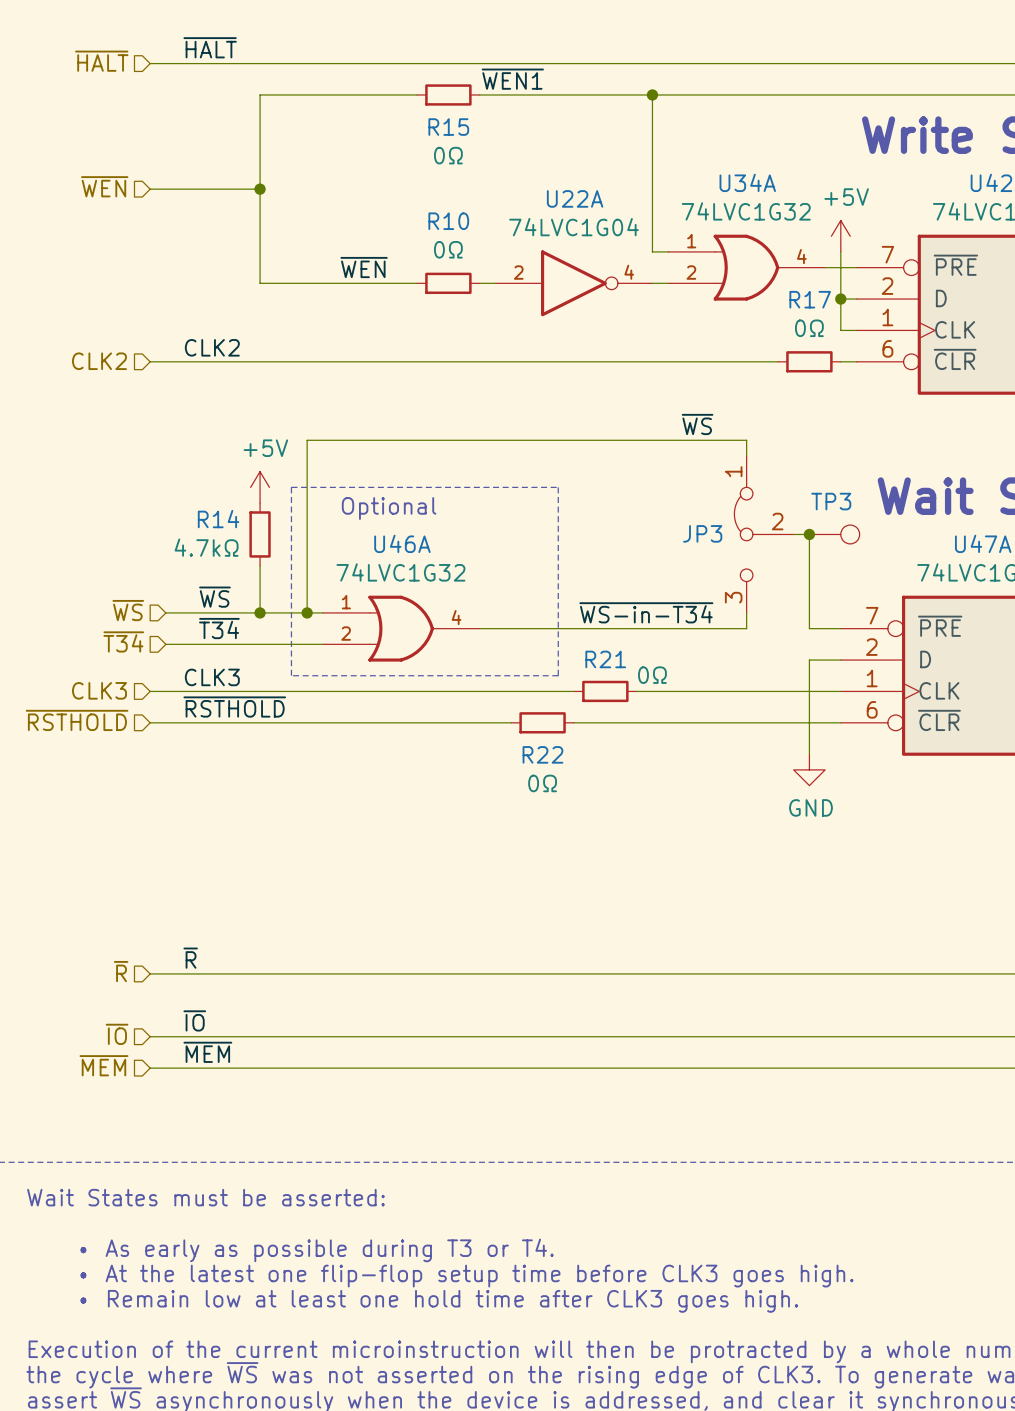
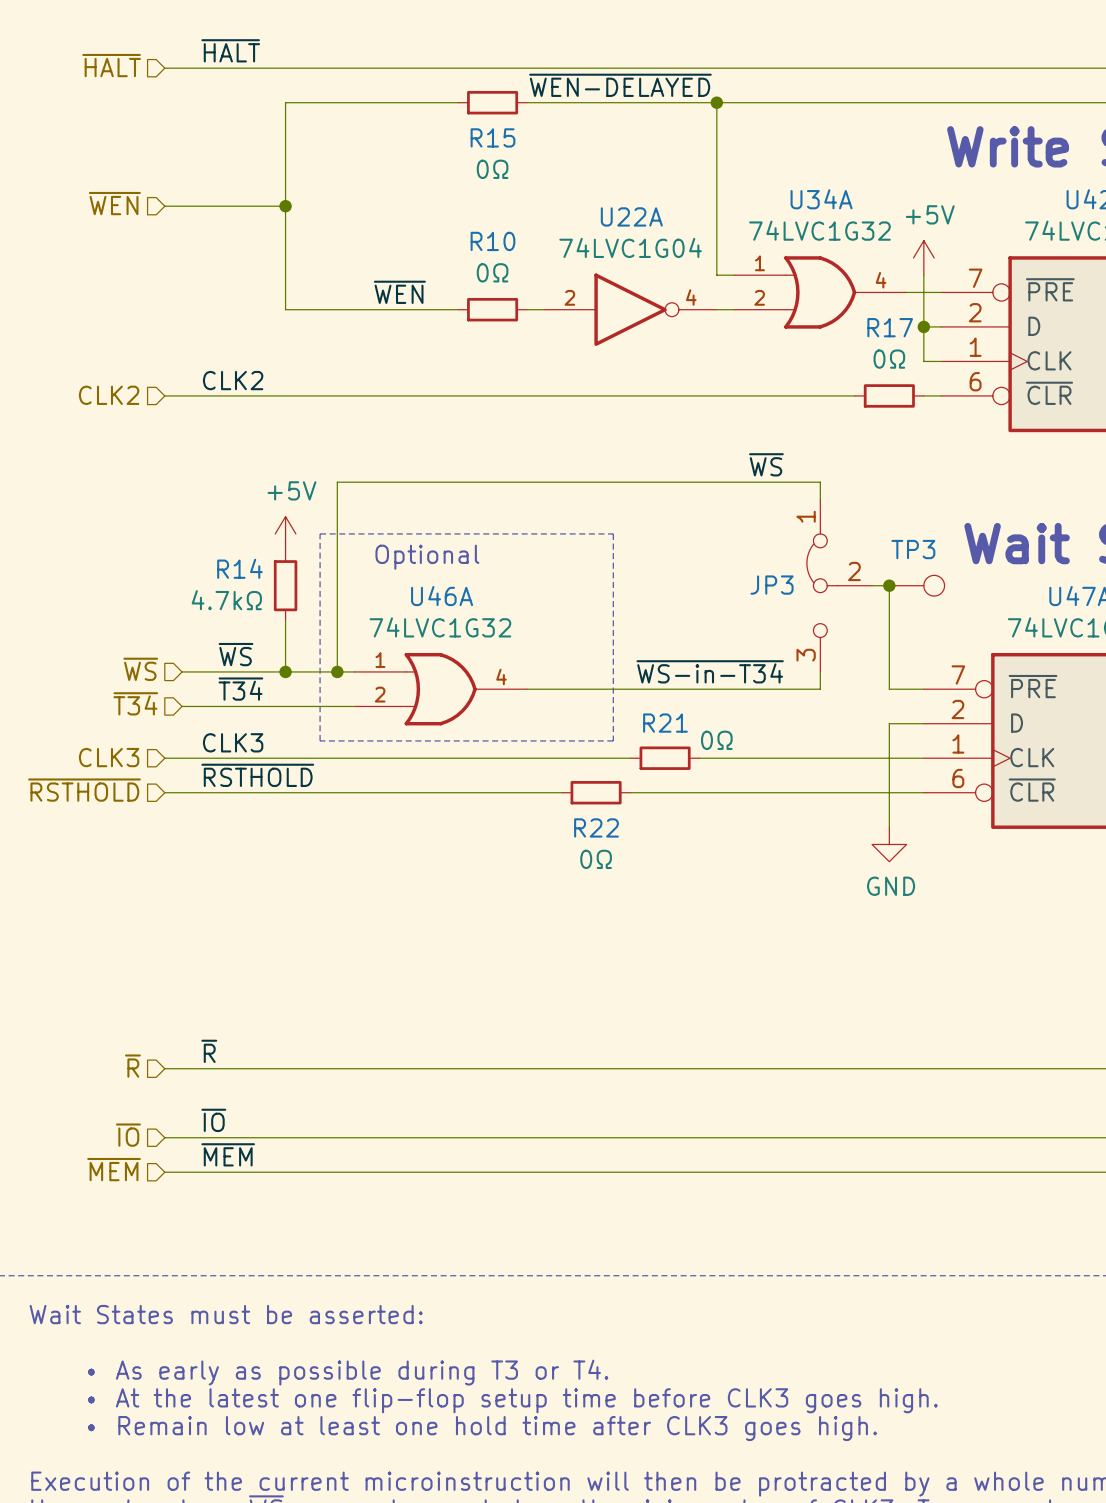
label: ~{WEN1} (512, 79) -> ~{WEN-DELAYED} (620, 85)

